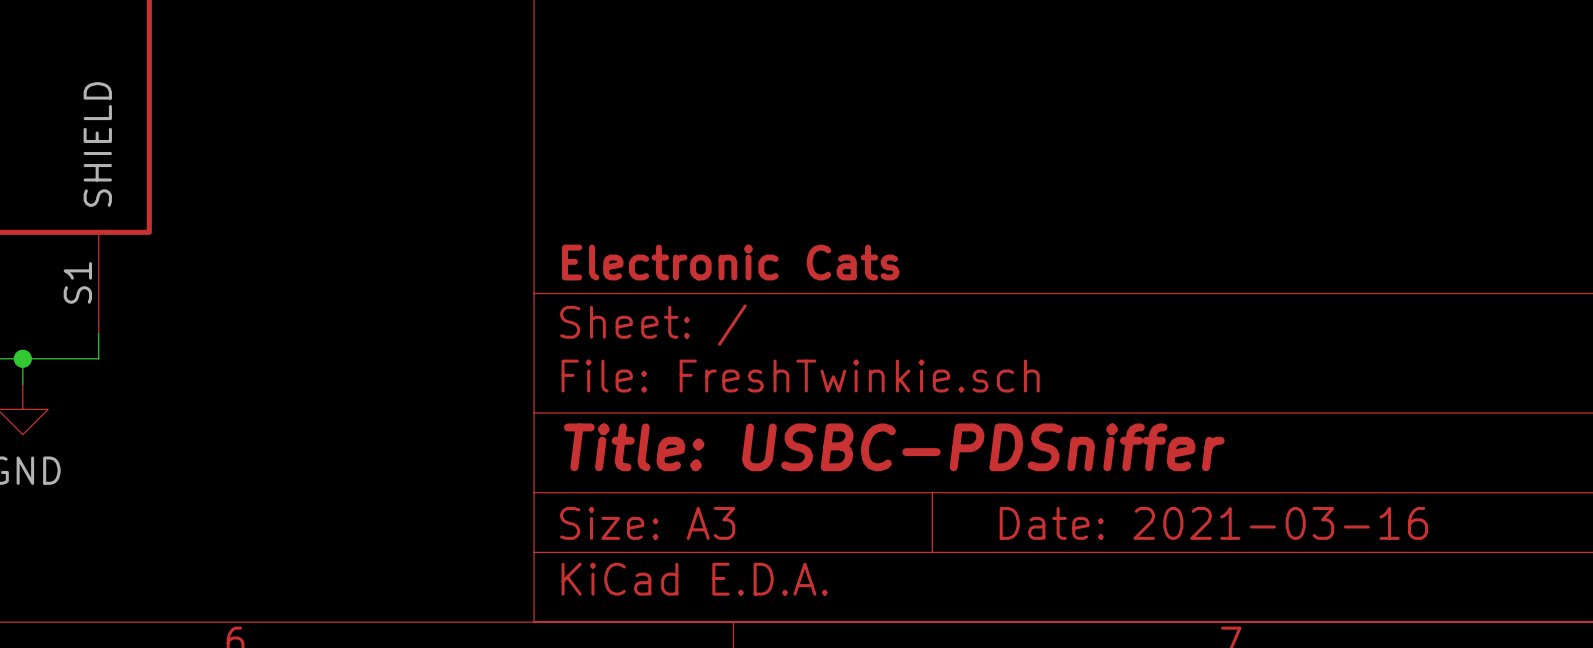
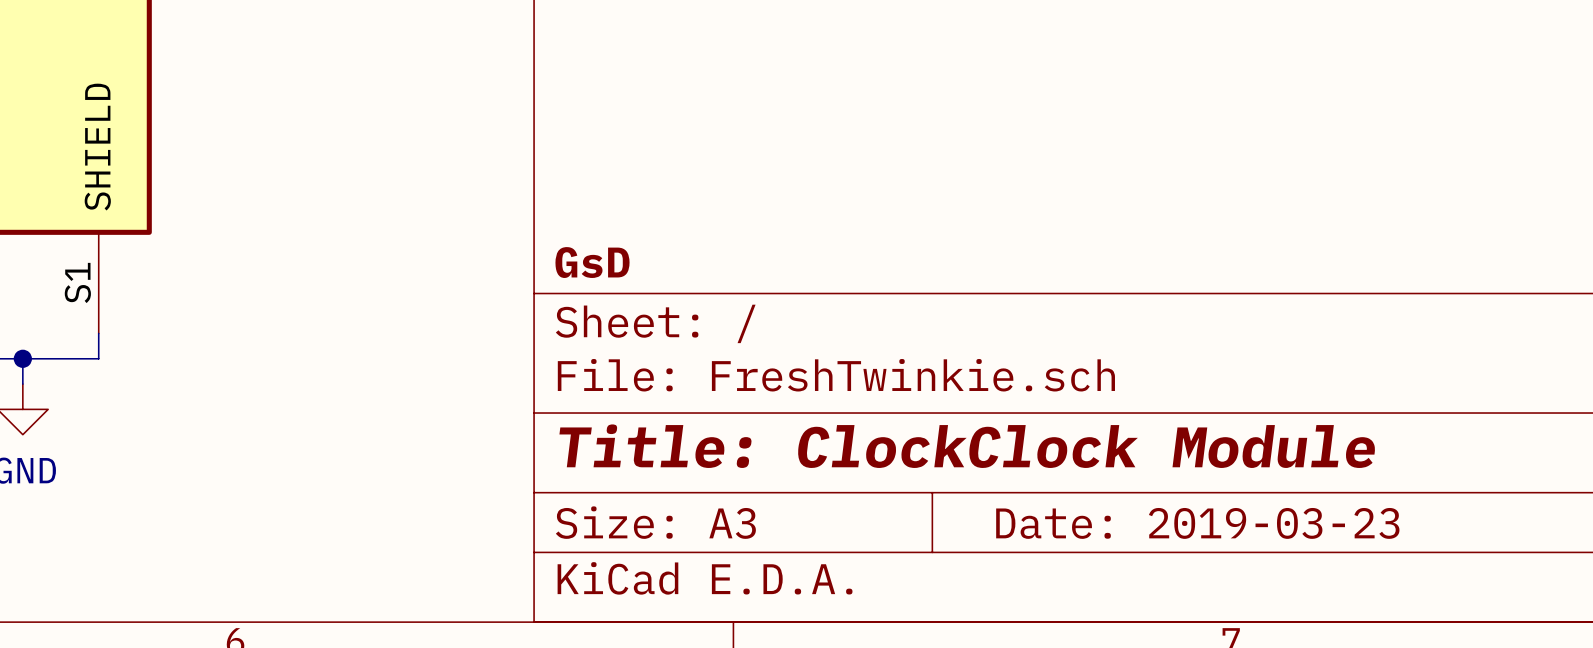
title block: Electronic Cats (730, 262) -> GsD (592, 262)
title block: Title: USBC-PDSniffer (894, 447) -> Title: ClockClock Module (967, 446)
title block: Date: 2021-03-16 (1213, 523) -> Date: 2019-03-23 (1197, 523)

